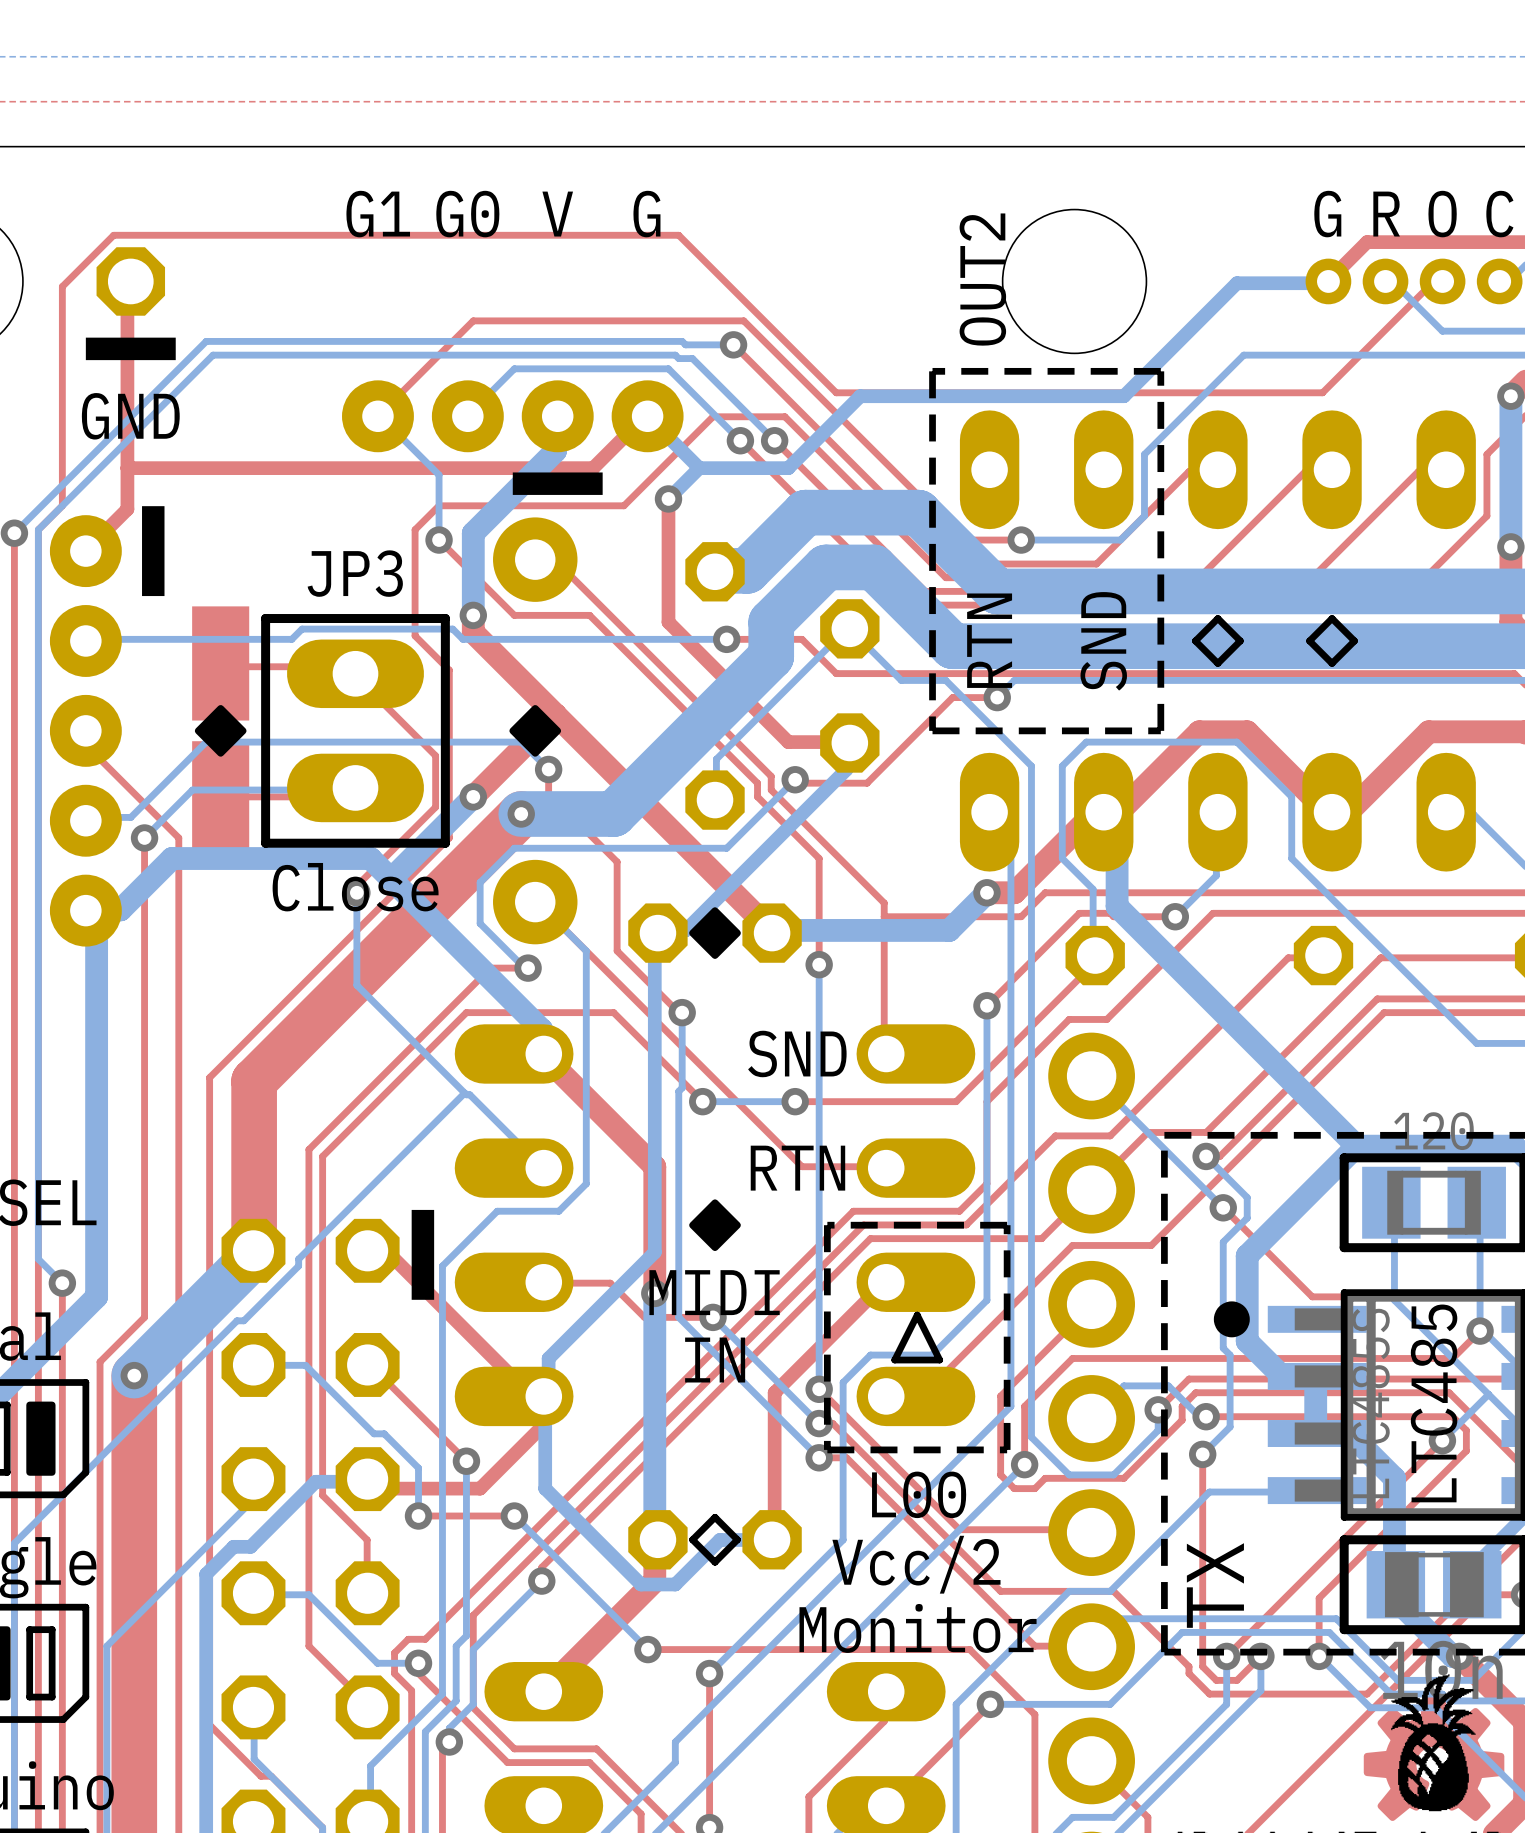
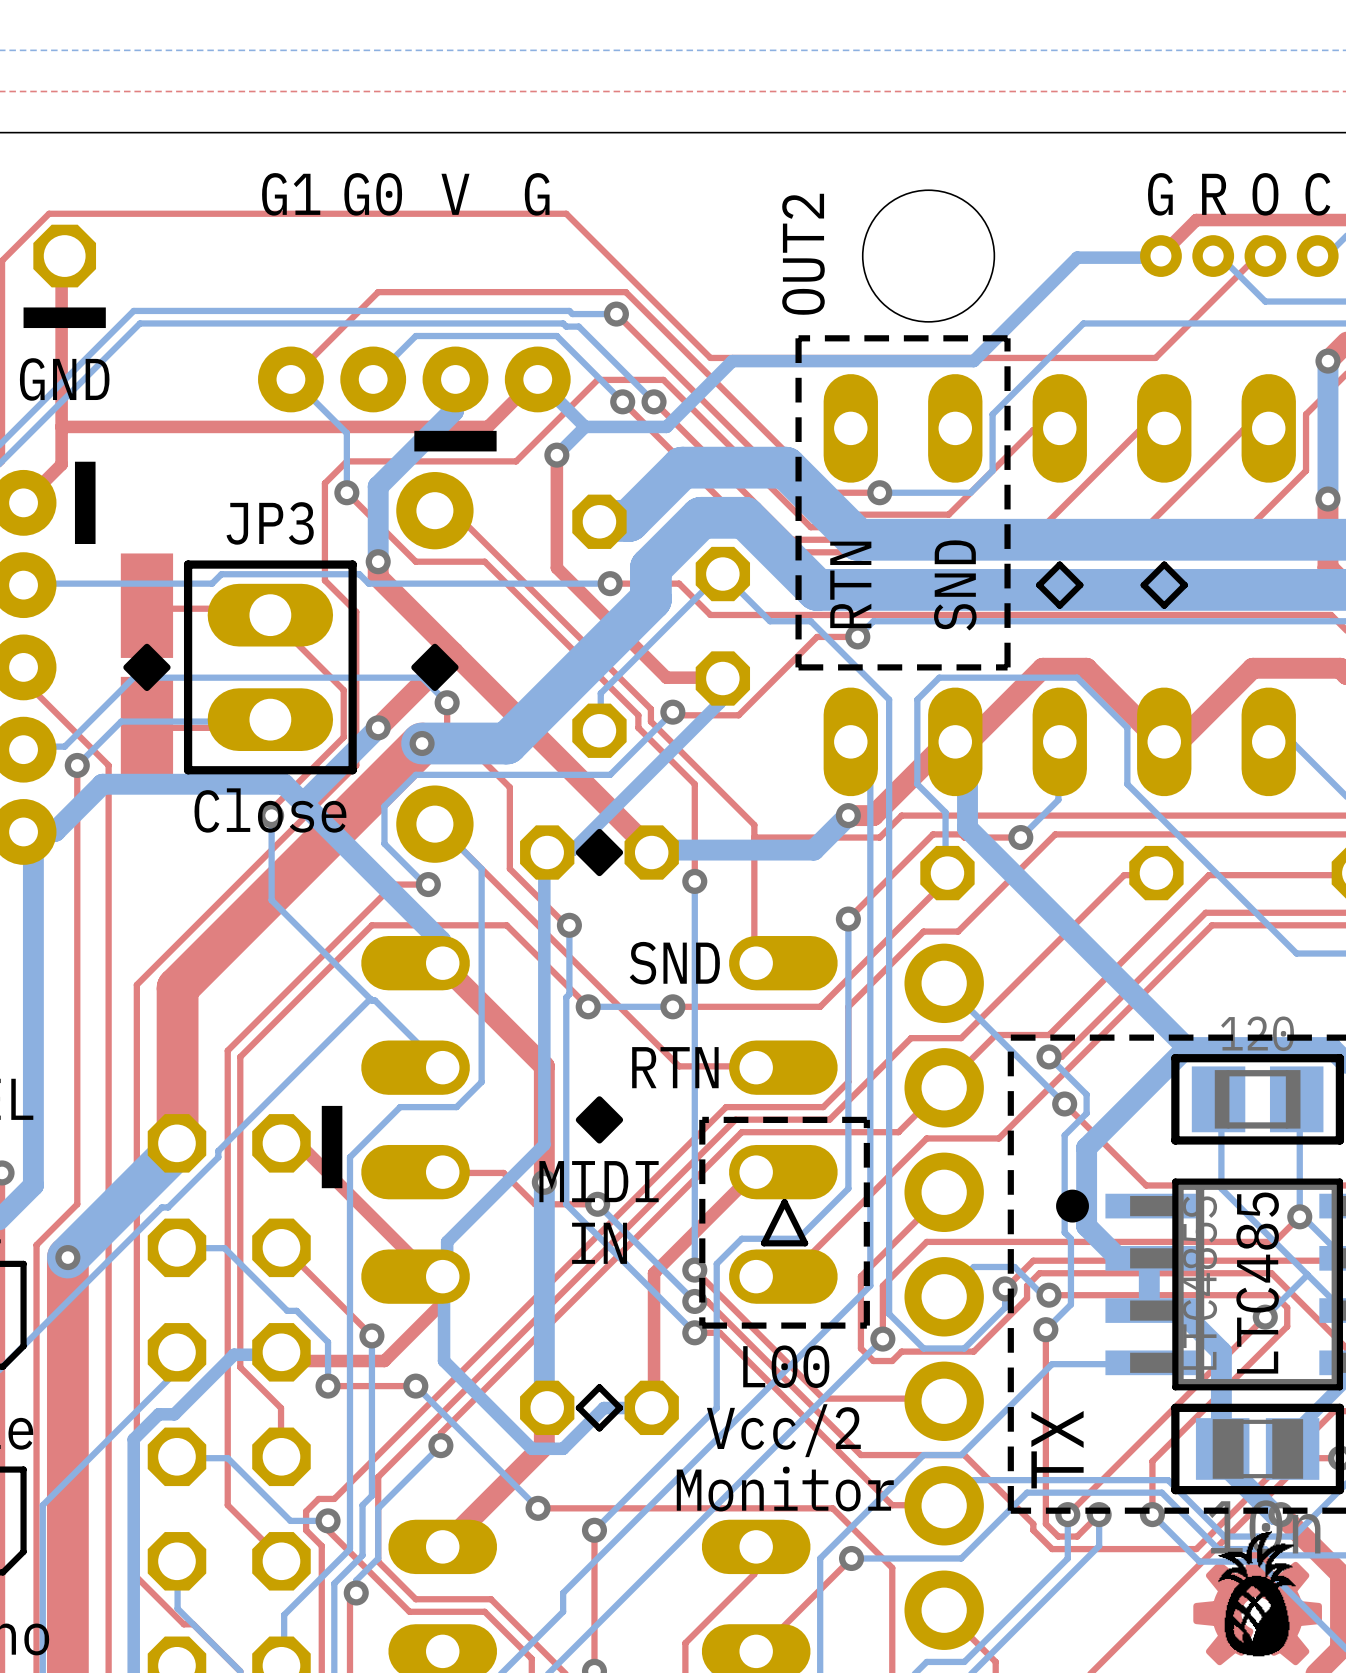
text position: OUT2 (982, 279) -> OUT2 (803, 254)

